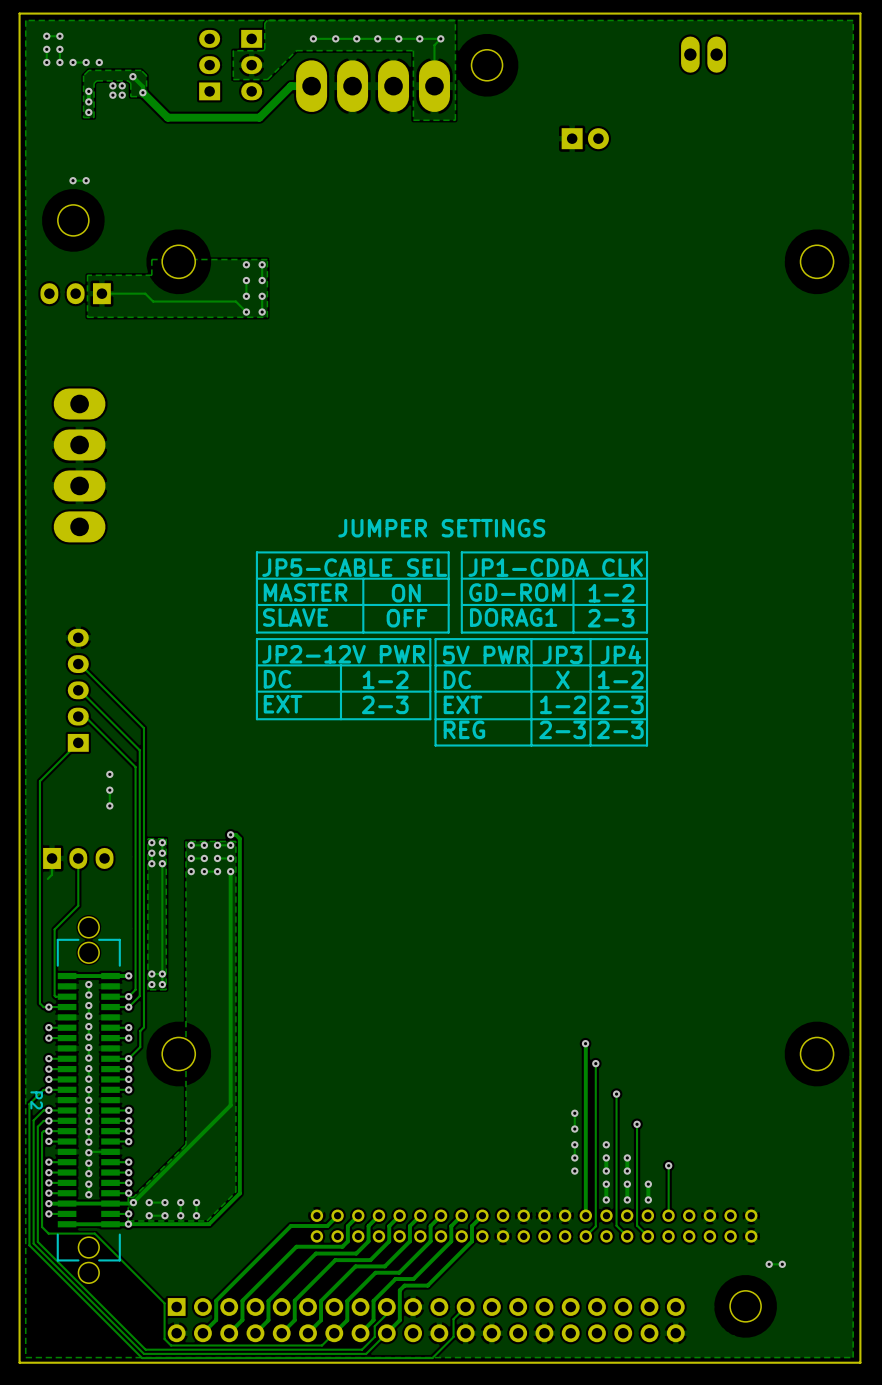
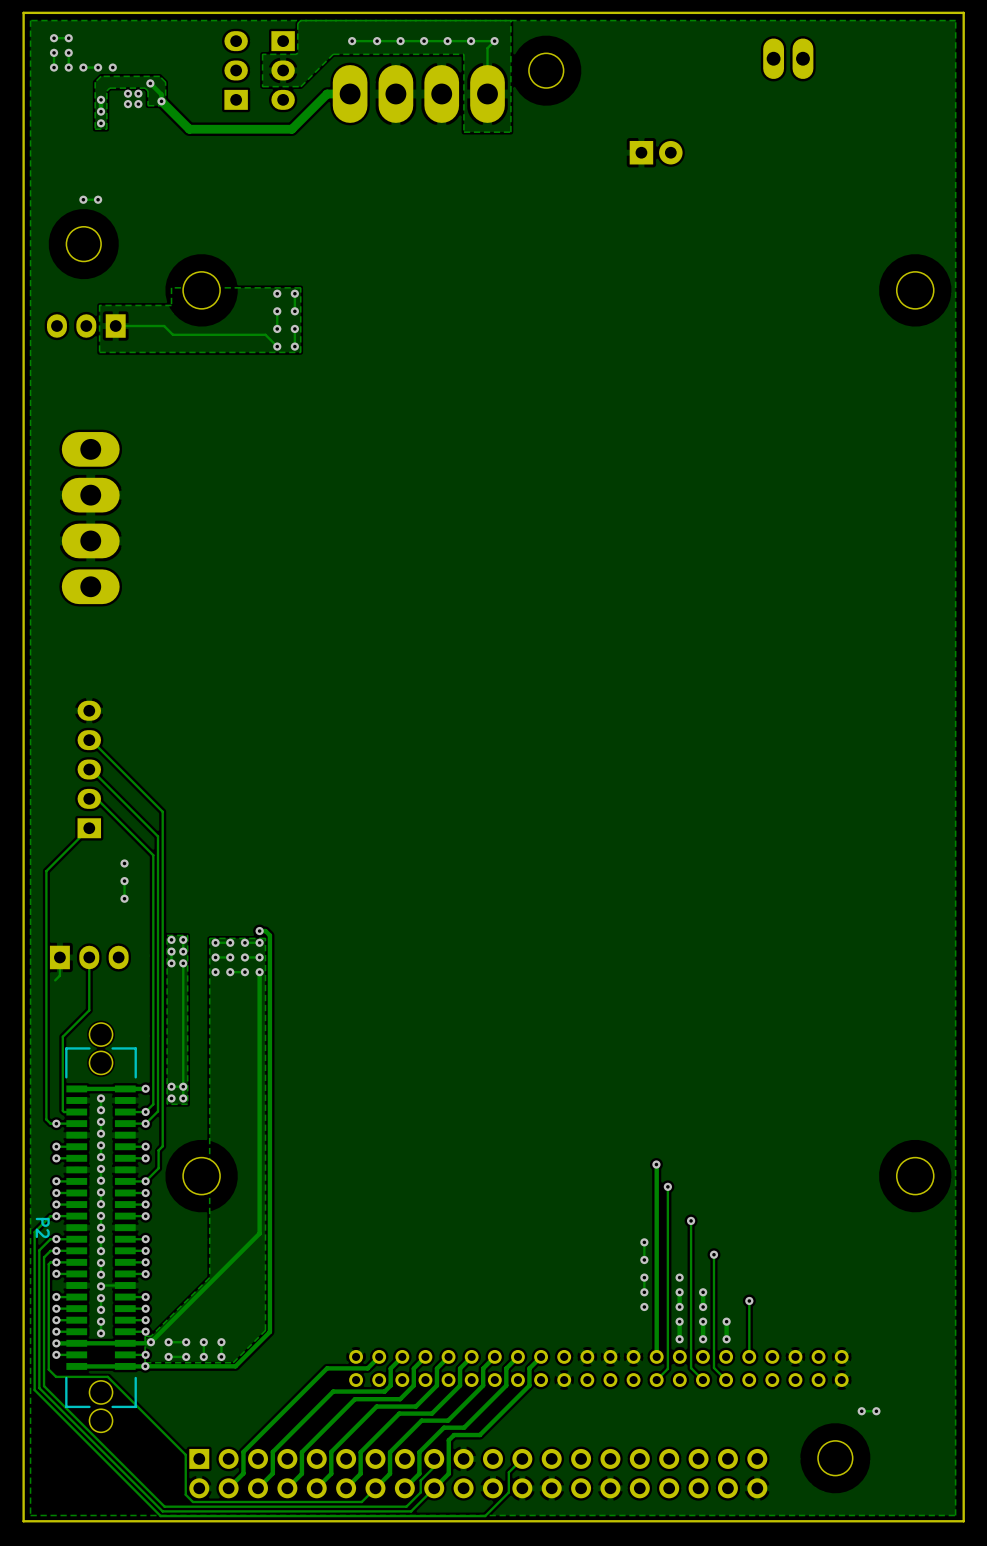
text: JUMPER SETTINGS (441, 528) -> none
line: (448, 552) (256, 552) (256, 632) (448, 632) (448, 552) -> none
line: (647, 552) (461, 552) (461, 632) (647, 632) (647, 552) -> none
text: JP5-CABLE SEL (354, 567) -> none
text: JP1-CDDA CLK (555, 567) -> none
line: (363, 578) (363, 632) -> none
line: (448, 578) (256, 578) -> none
line: (573, 578) (573, 632) -> none
line: (647, 578) (461, 578) -> none
text: MASTER (305, 592) -> none
text: GD-ROM (517, 592) -> none
text: ON (406, 593) -> none
text: 1-2 (611, 593) -> none
line: (448, 604) (256, 604) -> none
line: (647, 604) (461, 604) -> none
text: SLAVE (295, 617) -> none
text: DORAG1 (513, 617) -> none
text: OFF (407, 618) -> none
text: 2-3 (611, 618) -> none
line: (430, 639) (430, 719) (256, 719) (256, 639) (430, 639) -> none
line: (531, 639) (531, 745) -> none
line: (590, 639) (590, 745) -> none
line: (647, 639) (435, 639) (435, 745) (647, 745) (647, 639) -> none
text: JP2-12V PWR (343, 654) -> none
text: 5V PWR (485, 654) -> none
text: JP3 (562, 654) -> none
text: JP4 (620, 654) -> none
line: (340, 665) (340, 719) -> none
line: (430, 665) (256, 665) -> none
line: (647, 665) (435, 665) -> none
text: DC (277, 679) -> none
text: 1-2 (385, 679) -> none
text: DC (457, 679) -> none
text: X (562, 679) -> none
text: 1-2 (620, 679) -> none
line: (430, 691) (256, 691) -> none
line: (647, 691) (435, 691) -> none
text: EXT (283, 704) -> none
text: 2-3 (385, 704) -> none
text: EXT (462, 704) -> none
text: 1-2 (562, 704) -> none
text: 2-3 (620, 704) -> none
line: (647, 719) (435, 719) -> none
text: REG (464, 729) -> none
text: 2-3 (562, 729) -> none
text: 2-3 (620, 729) -> none

